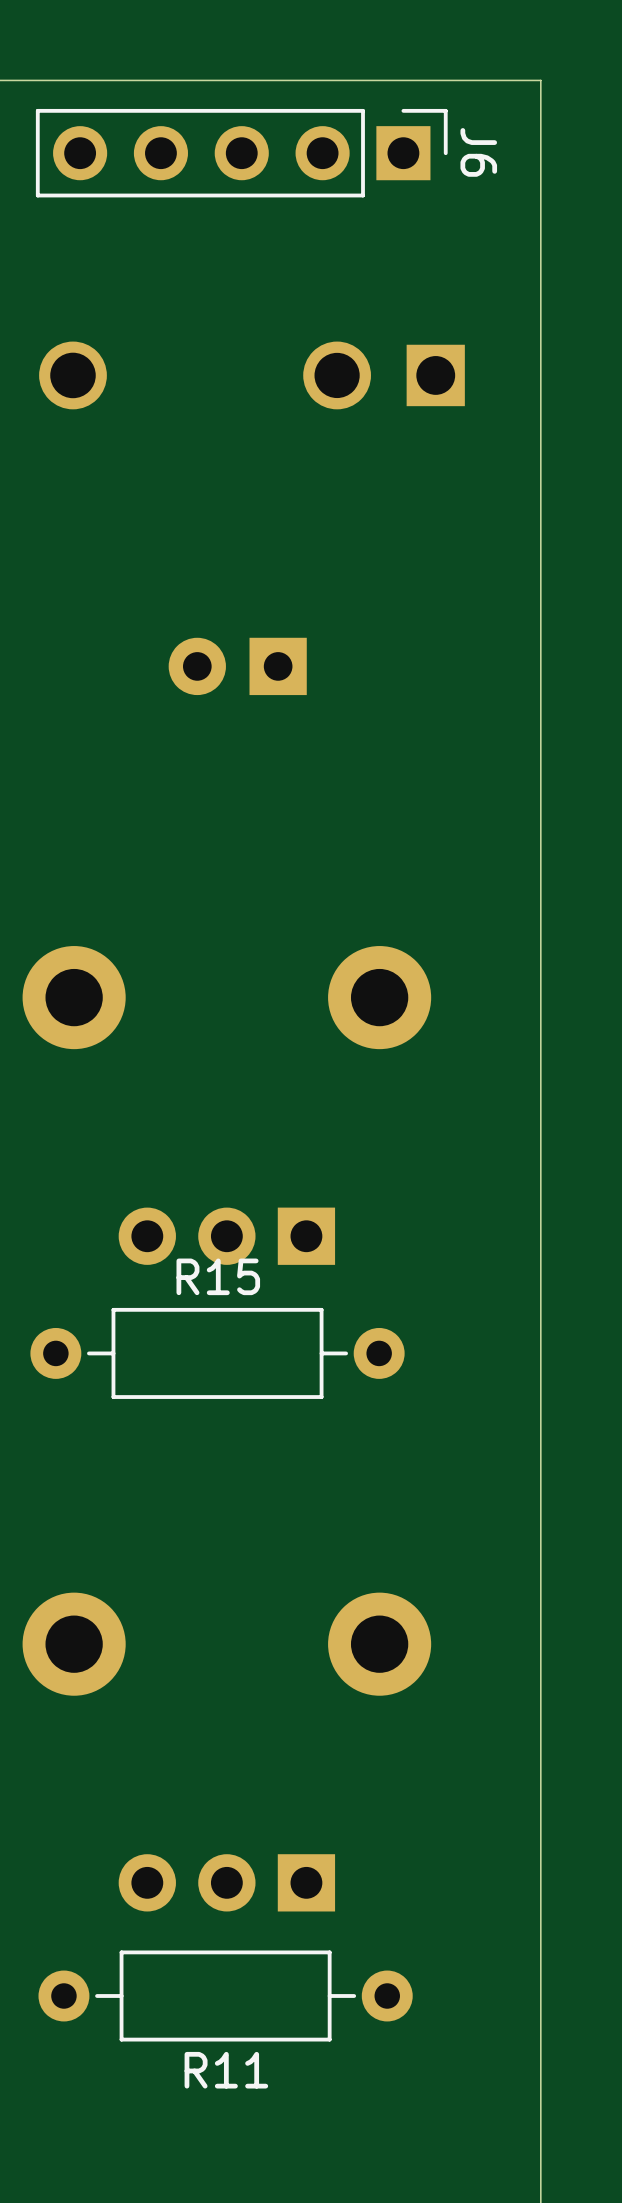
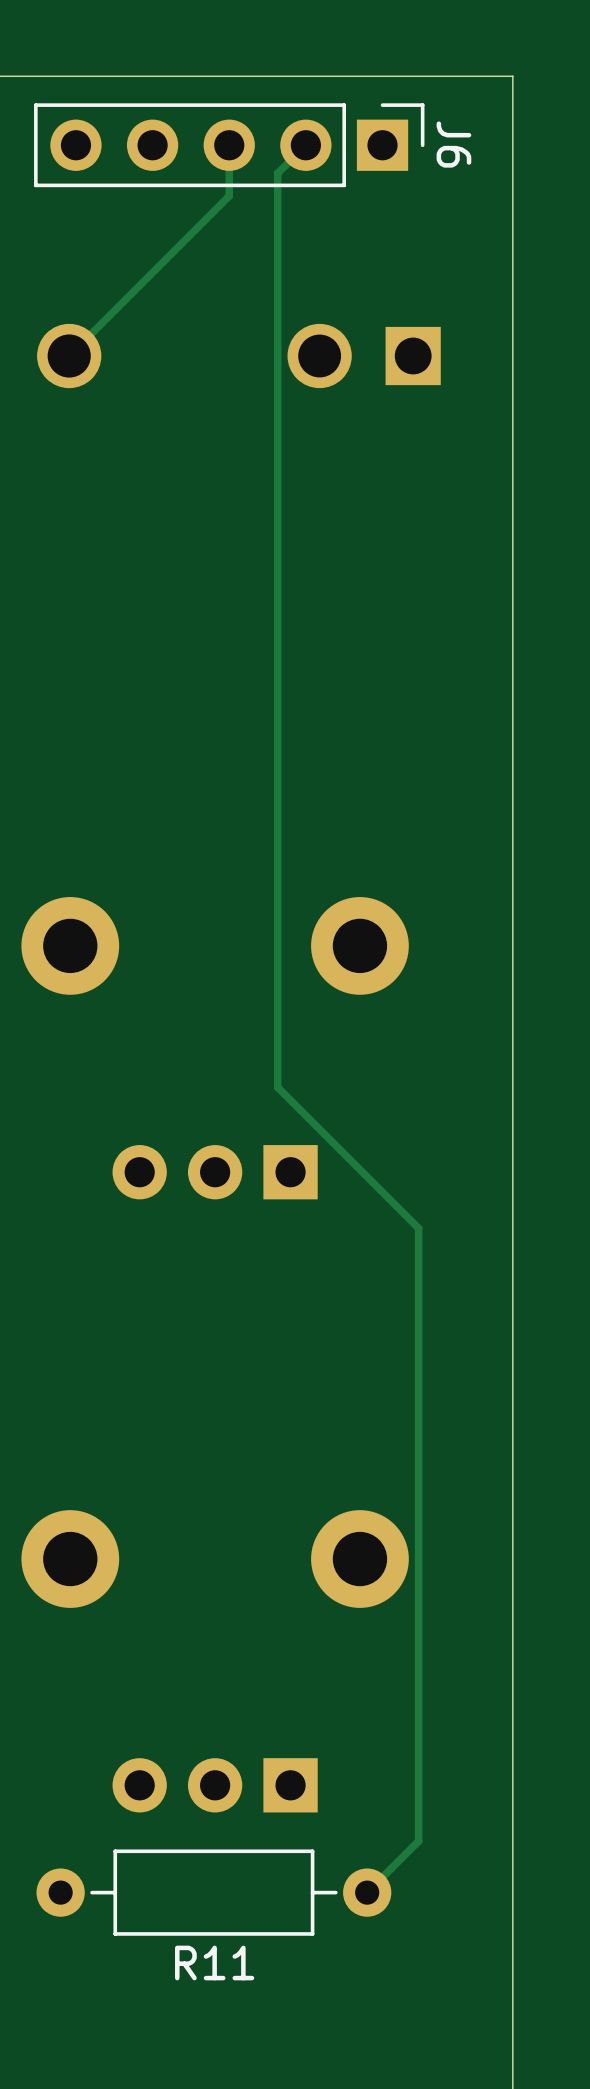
track: none -> (229, 145) (229, 195) (69, 356)
track: none -> (305, 145) (277, 173) (277, 1087) (418, 1228) (418, 1841) (367, 1892)
part: (237, 666) -> none
R15: (217, 1353) -> none

